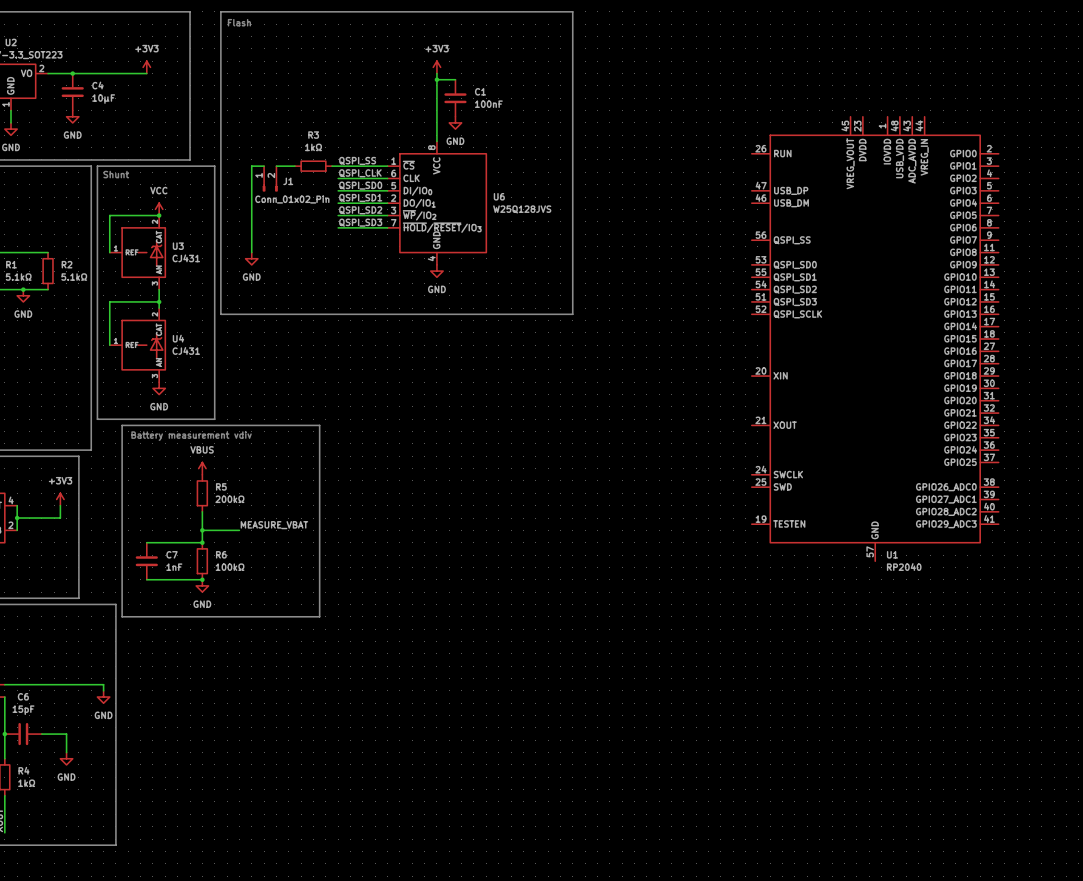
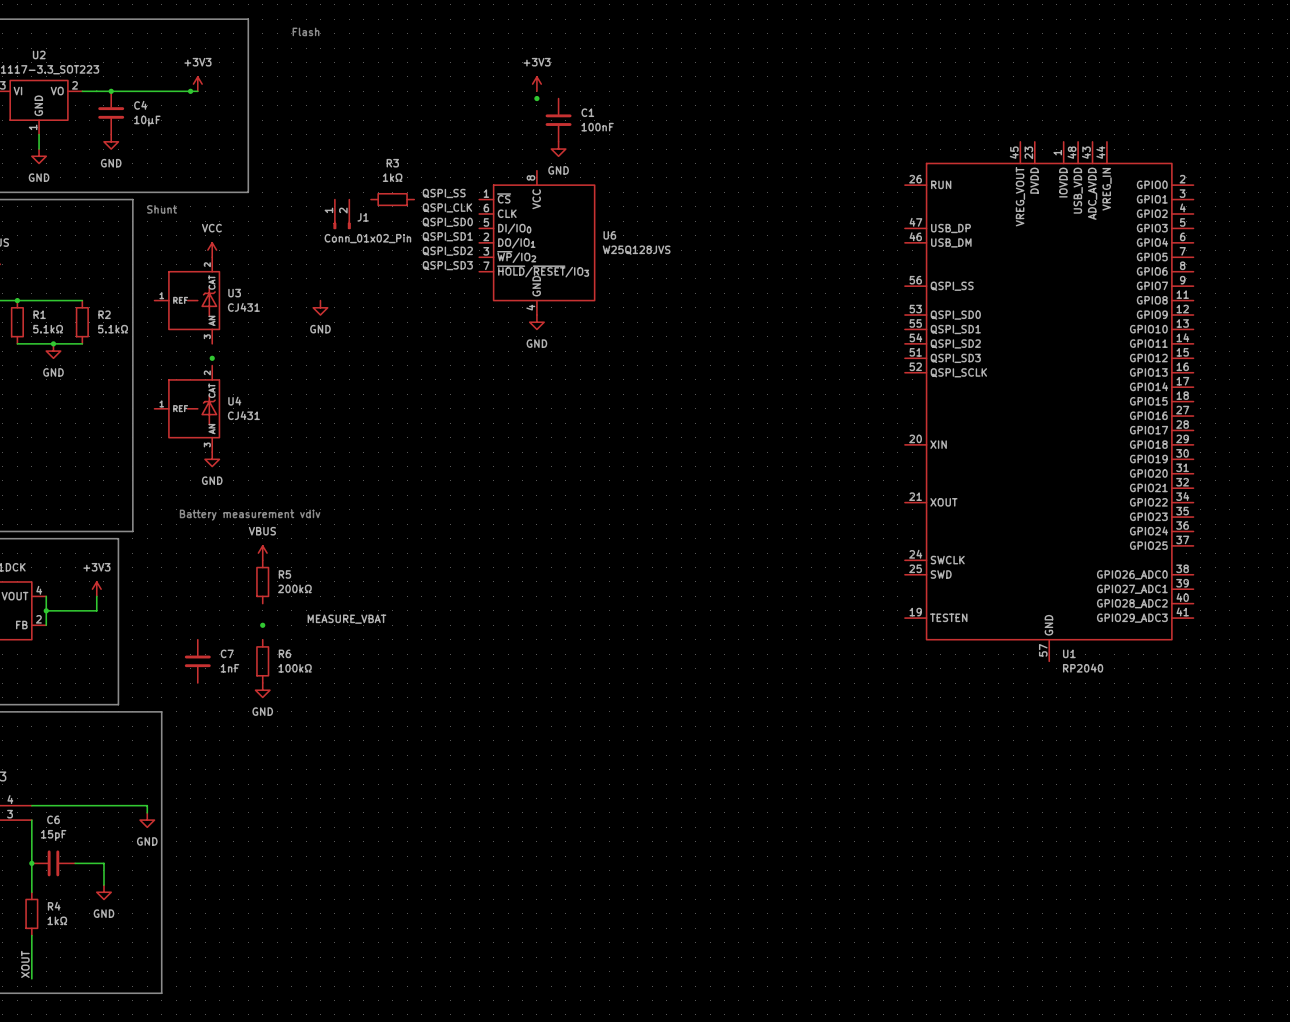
line: (220, 11) (572, 11) (572, 314) (220, 314) (220, 11) -> none
junction: none -> (190, 91)
wire: (436, 73) (436, 141) -> none
wire: (436, 79) (455, 79) -> none
line: (97, 166) (214, 166) (214, 419) (97, 419) (97, 166) -> none
wire: (264, 166) (251, 166) (251, 252) -> none
wire: (276, 166) (294, 166) -> none
wire: (332, 166) (387, 166) -> none
wire: (338, 178) (387, 178) -> none
wire: (338, 190) (387, 190) -> none
wire: (338, 203) (387, 203) -> none
wire: (159, 215) (109, 215) (109, 252) -> none
junction: (159, 215) -> none
wire: (338, 215) (387, 215) -> none
wire: (338, 227) (387, 227) -> none
wire: (159, 289) (159, 308) -> none
wire: (159, 301) (109, 301) (109, 345) -> none
line: (122, 425) (319, 425) (319, 616) (122, 616) (122, 425) -> none
wire: (202, 511) (202, 542) (146, 542) -> none
wire: (202, 530) (239, 530) -> none
junction: (202, 542) -> none
wire: (146, 579) (202, 579) -> none
junction: (202, 579) -> none

